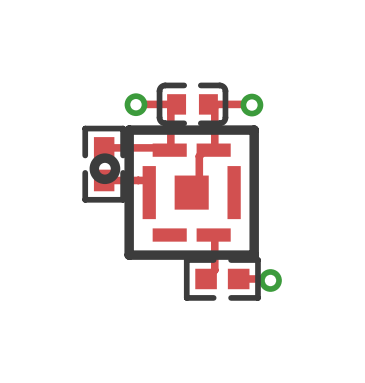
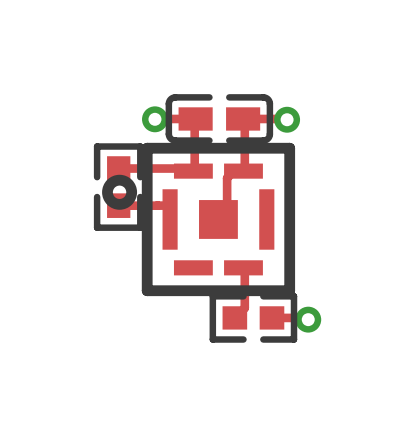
part footprint: [156, 82, 229, 127] -> [165, 94, 274, 144]

